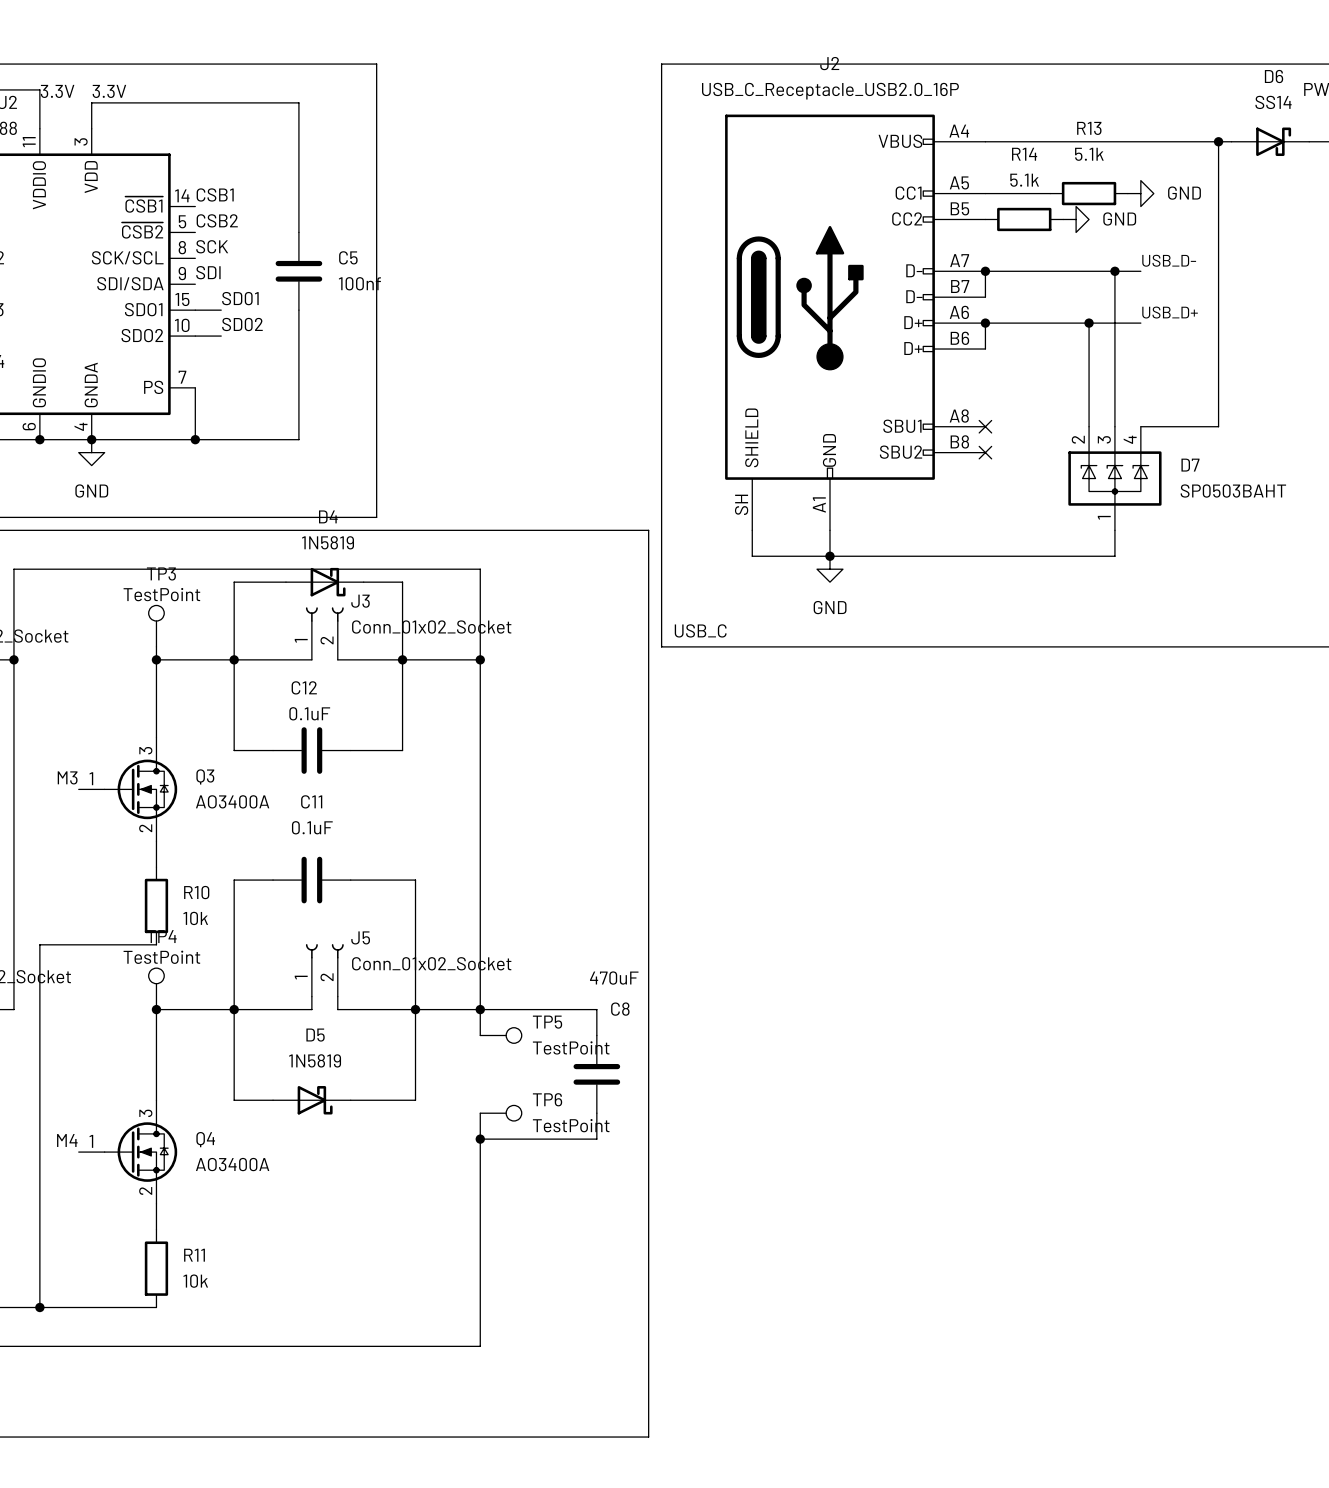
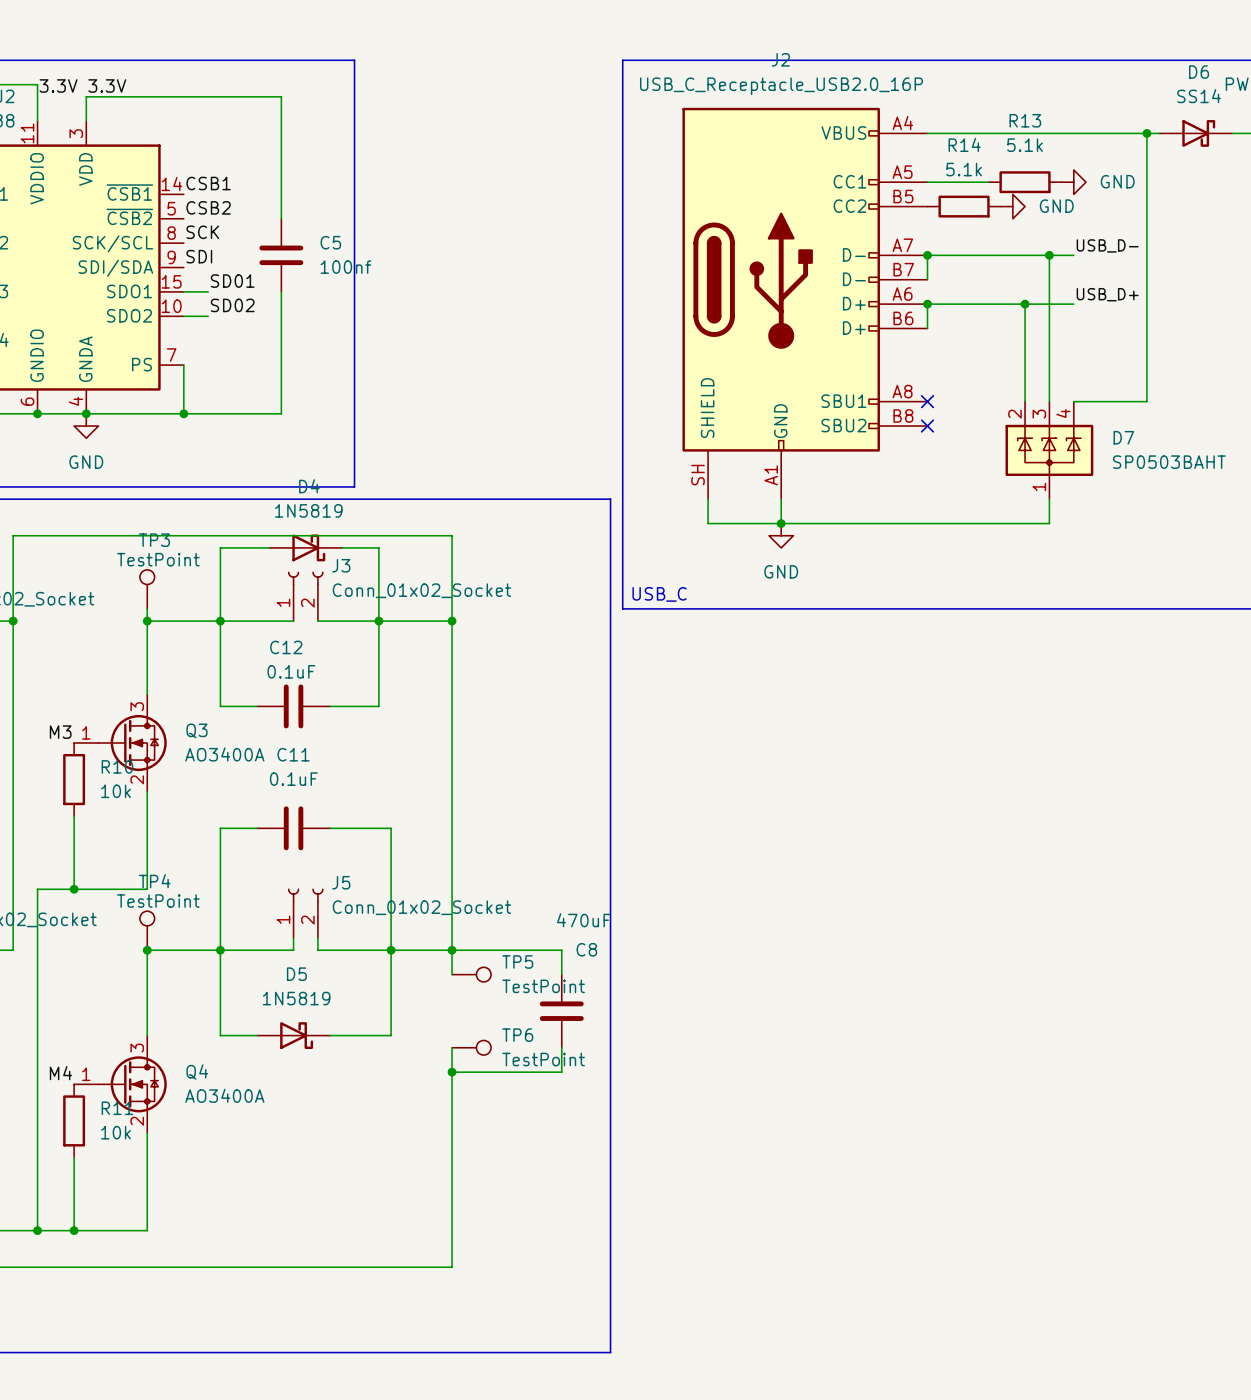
wire: none -> (74, 816) (74, 889)
wire: none -> (147, 816) (147, 889)
R10 position: (156, 905) -> (74, 779)
junction: none -> (74, 889)
wire: none -> (74, 1157) (74, 1230)
wire: none -> (147, 1157) (147, 1230)
R11 position: (156, 1268) -> (74, 1120)
junction: none -> (74, 1230)

